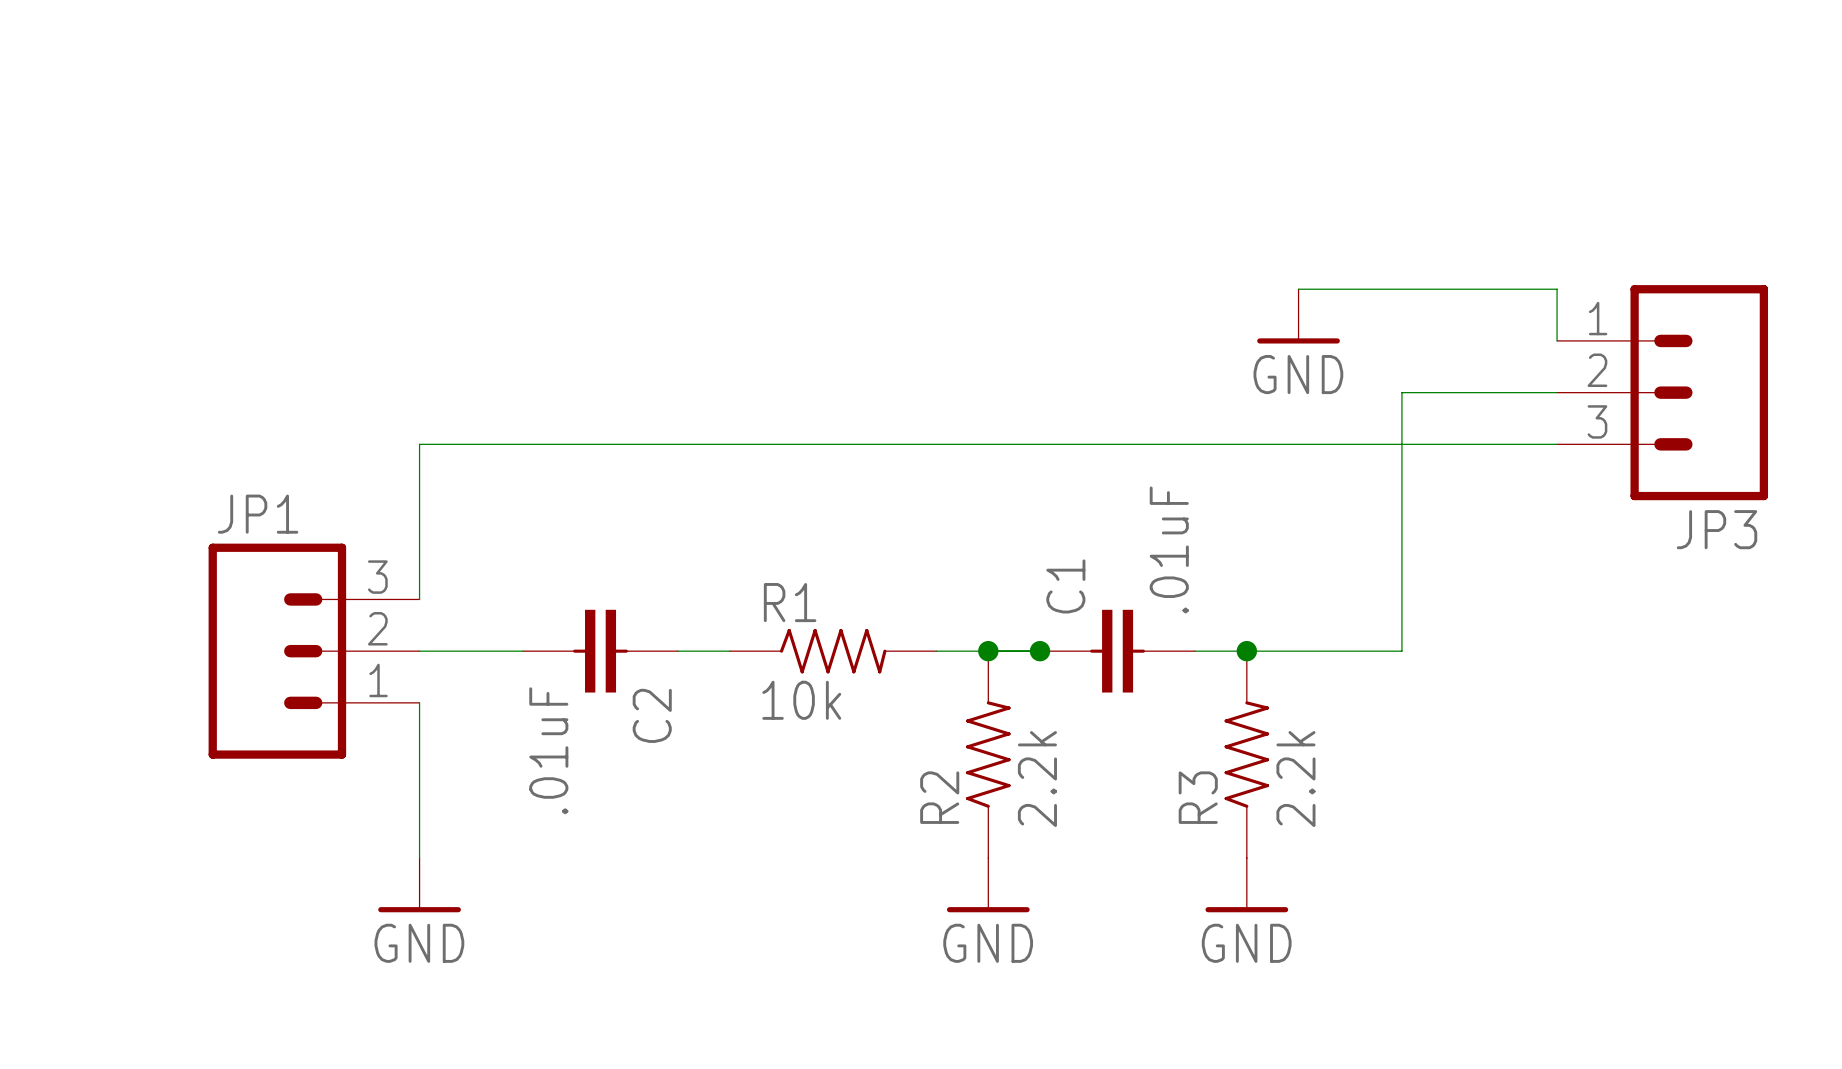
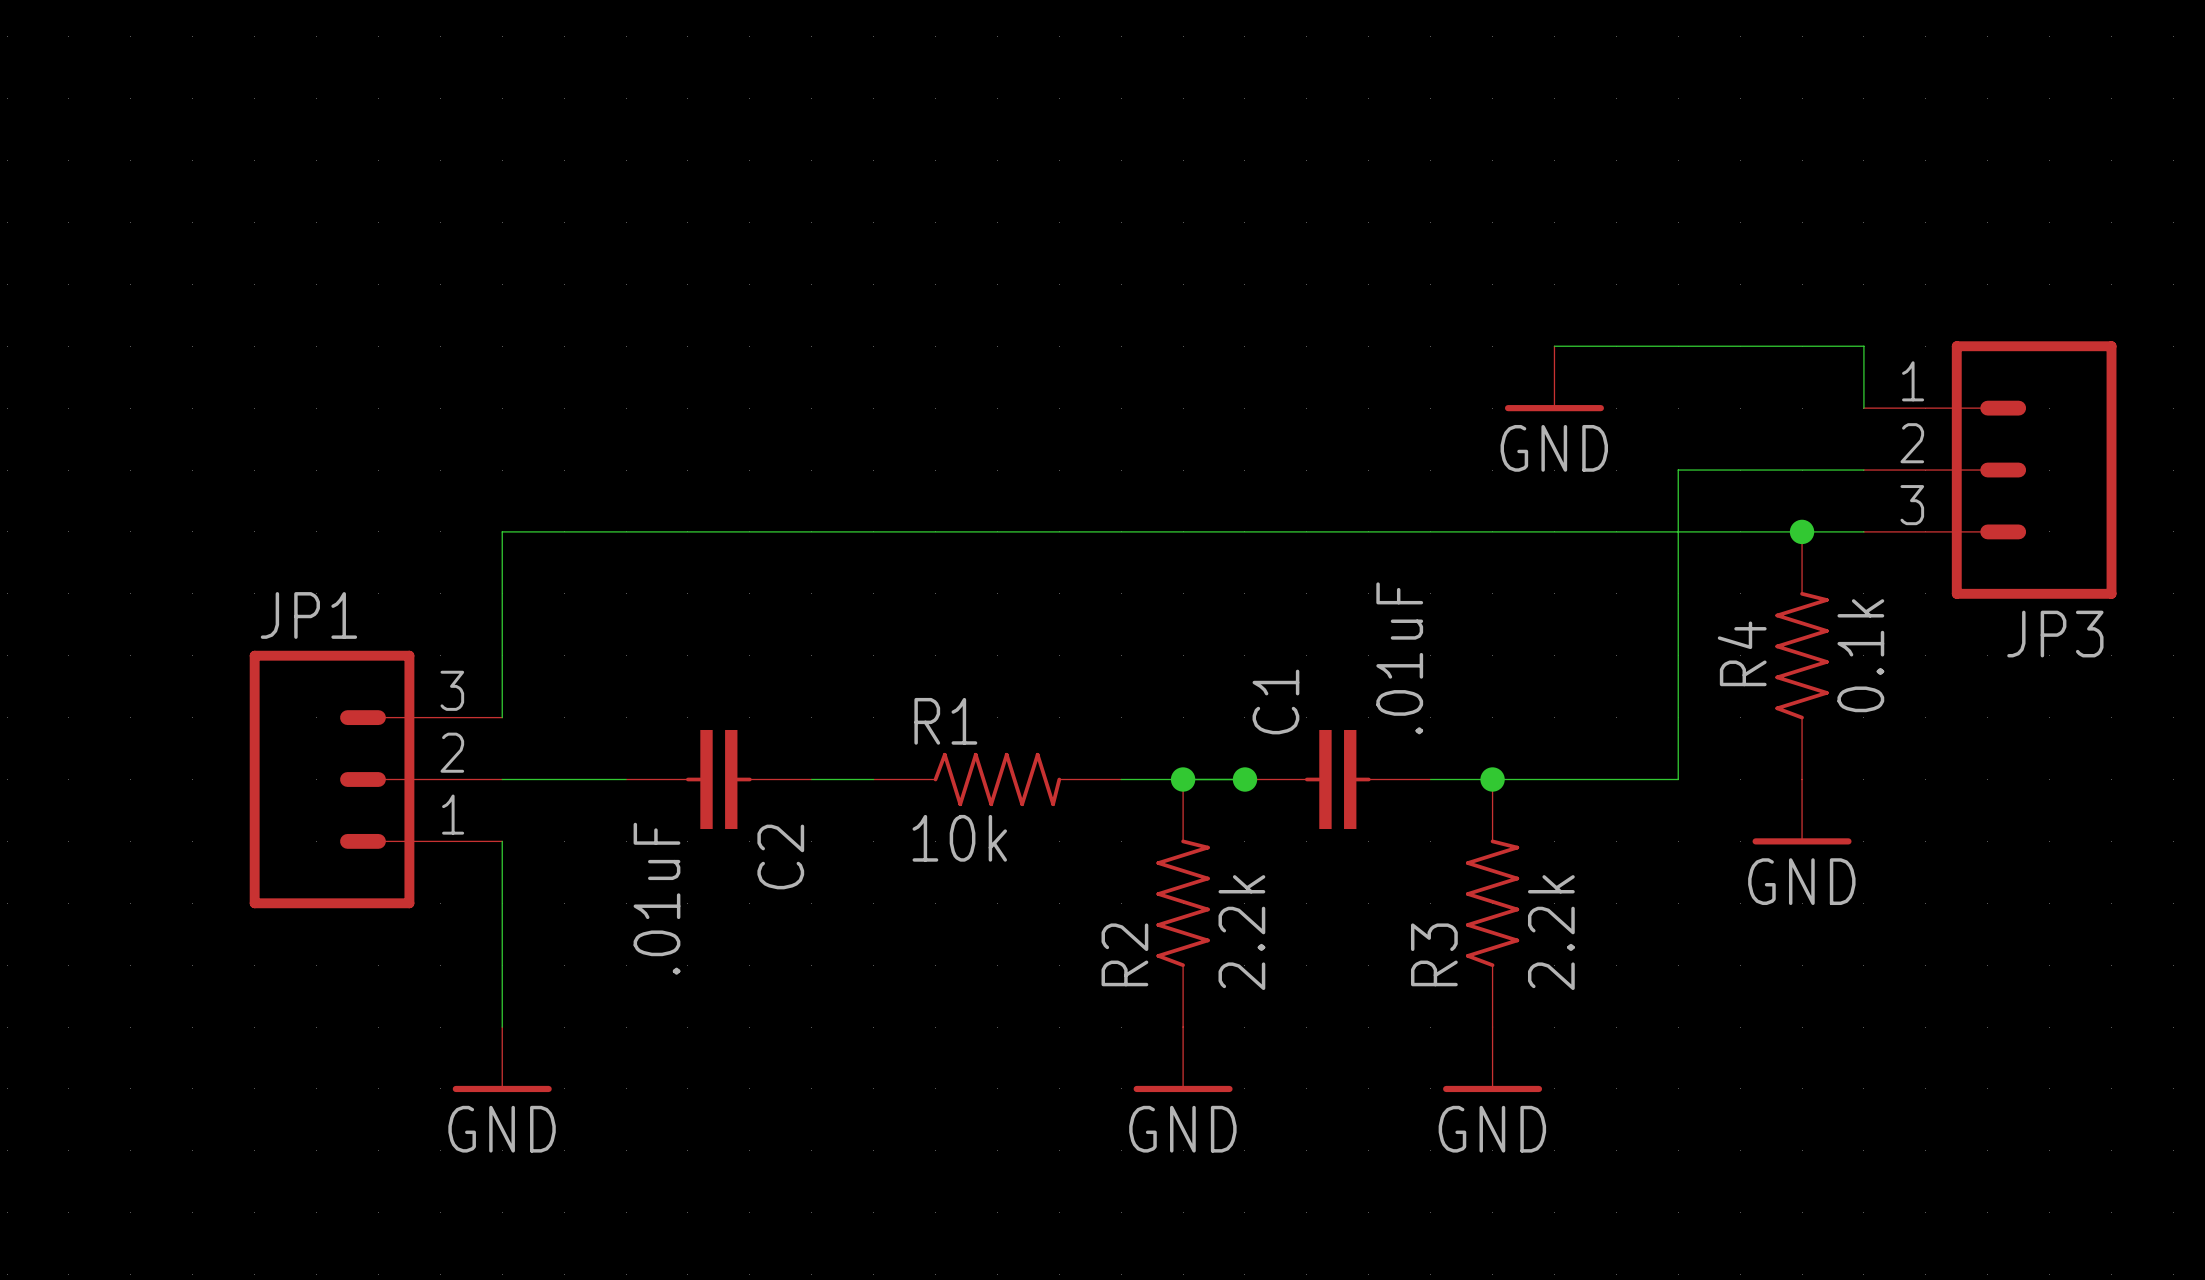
junction: none -> (1802, 531)
R4: none -> 0.1k (1802, 655)
power symbol: none -> GND (1802, 811)

